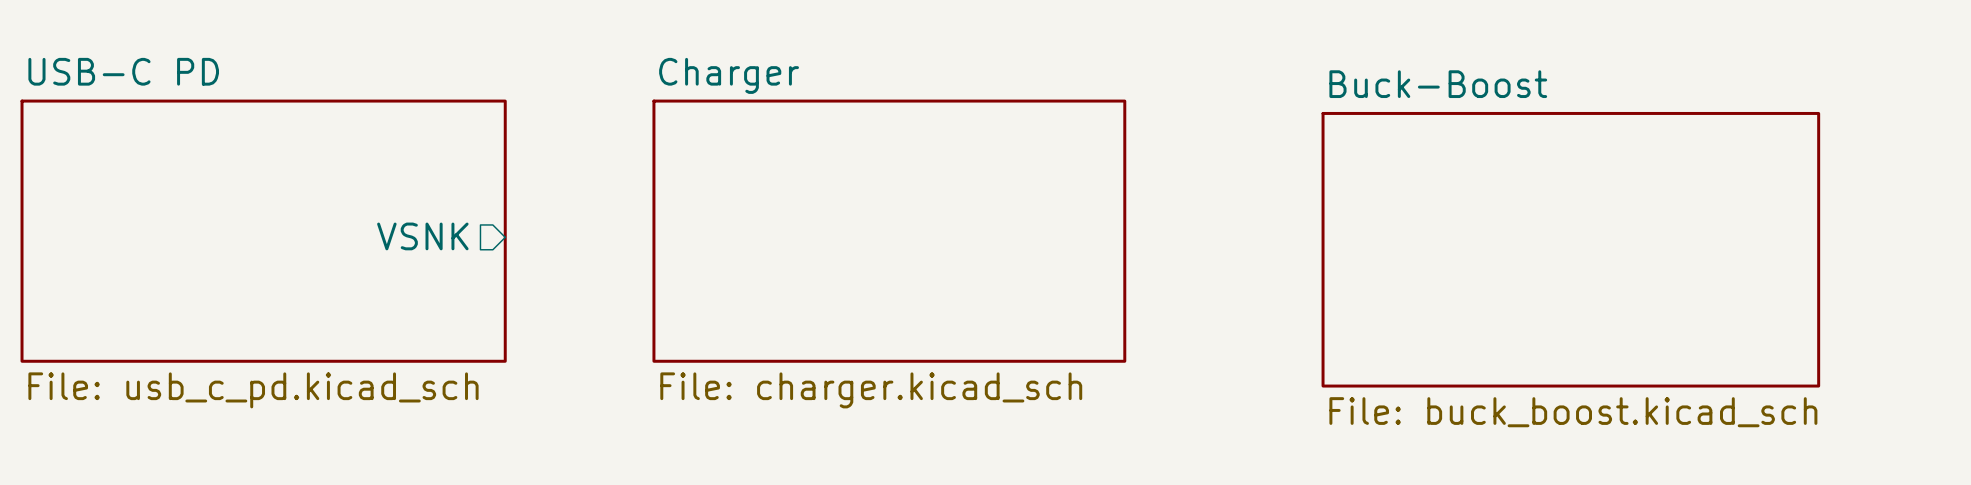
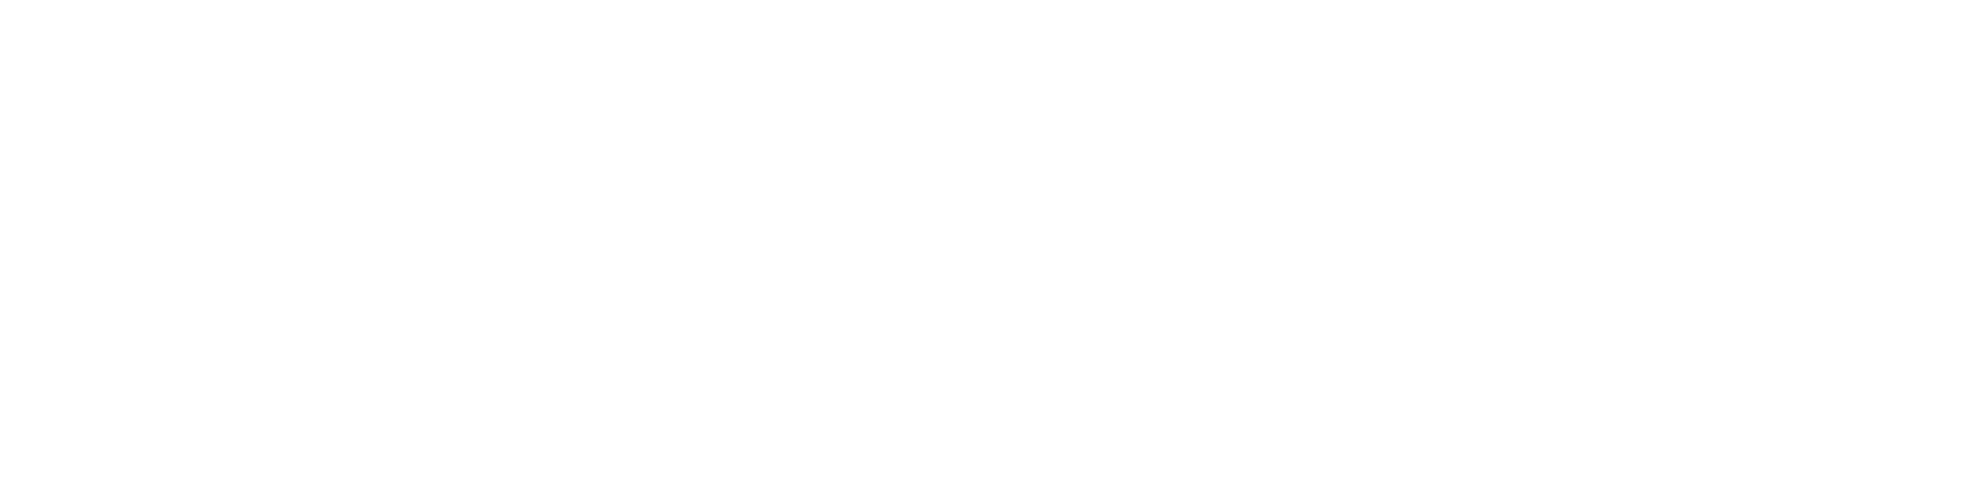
sheet USB-C PD: File: usb_c_pd.kicad_sch (263, 231) -> none
sheet Charger: File: charger.kicad_sch (889, 231) -> none
sheet pin: VSNK (422, 236) -> none
sheet Buck-Boost: File: buck_boost.kicad_sch (1570, 249) -> none

